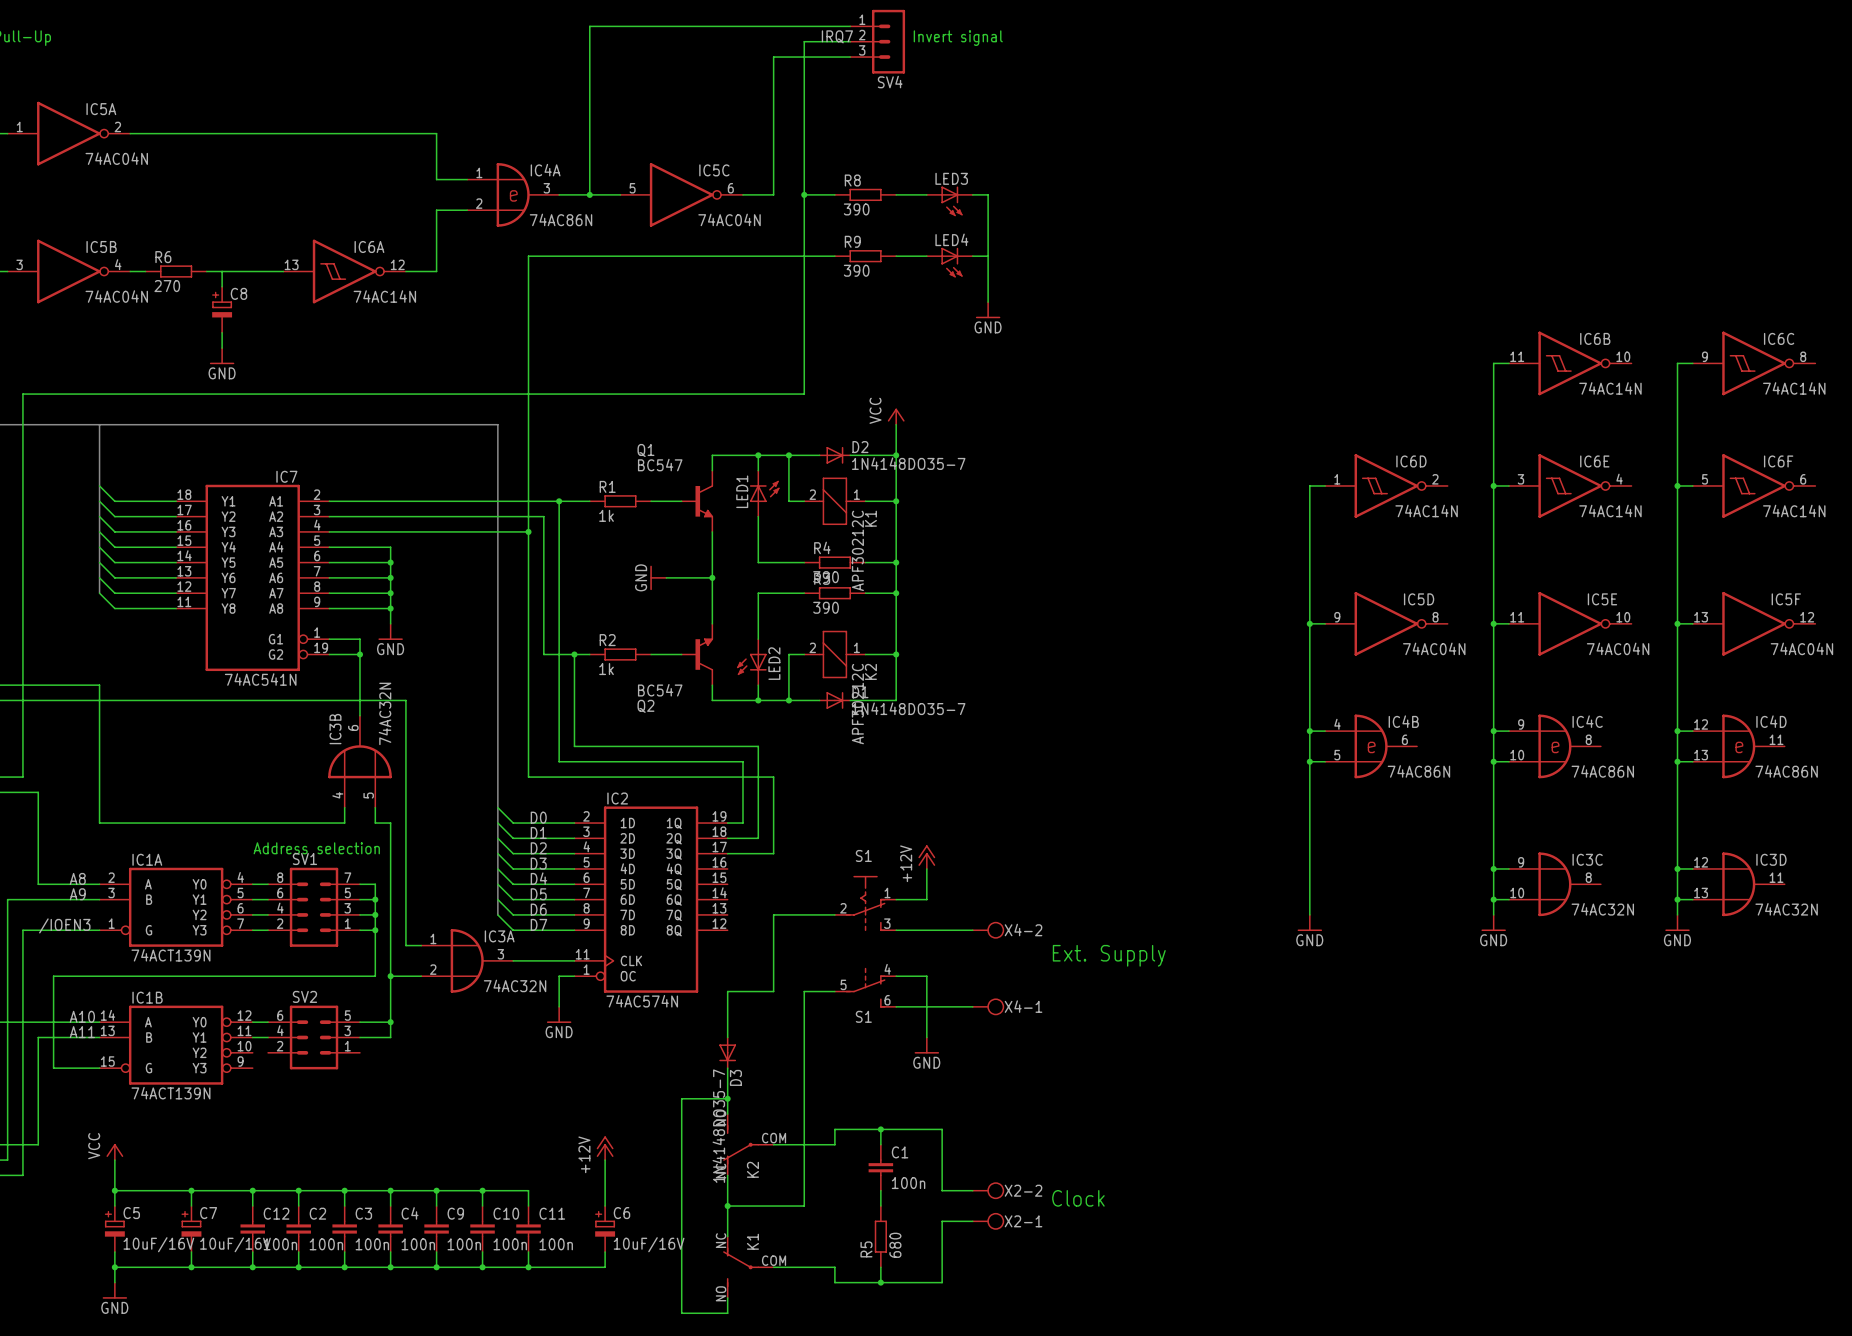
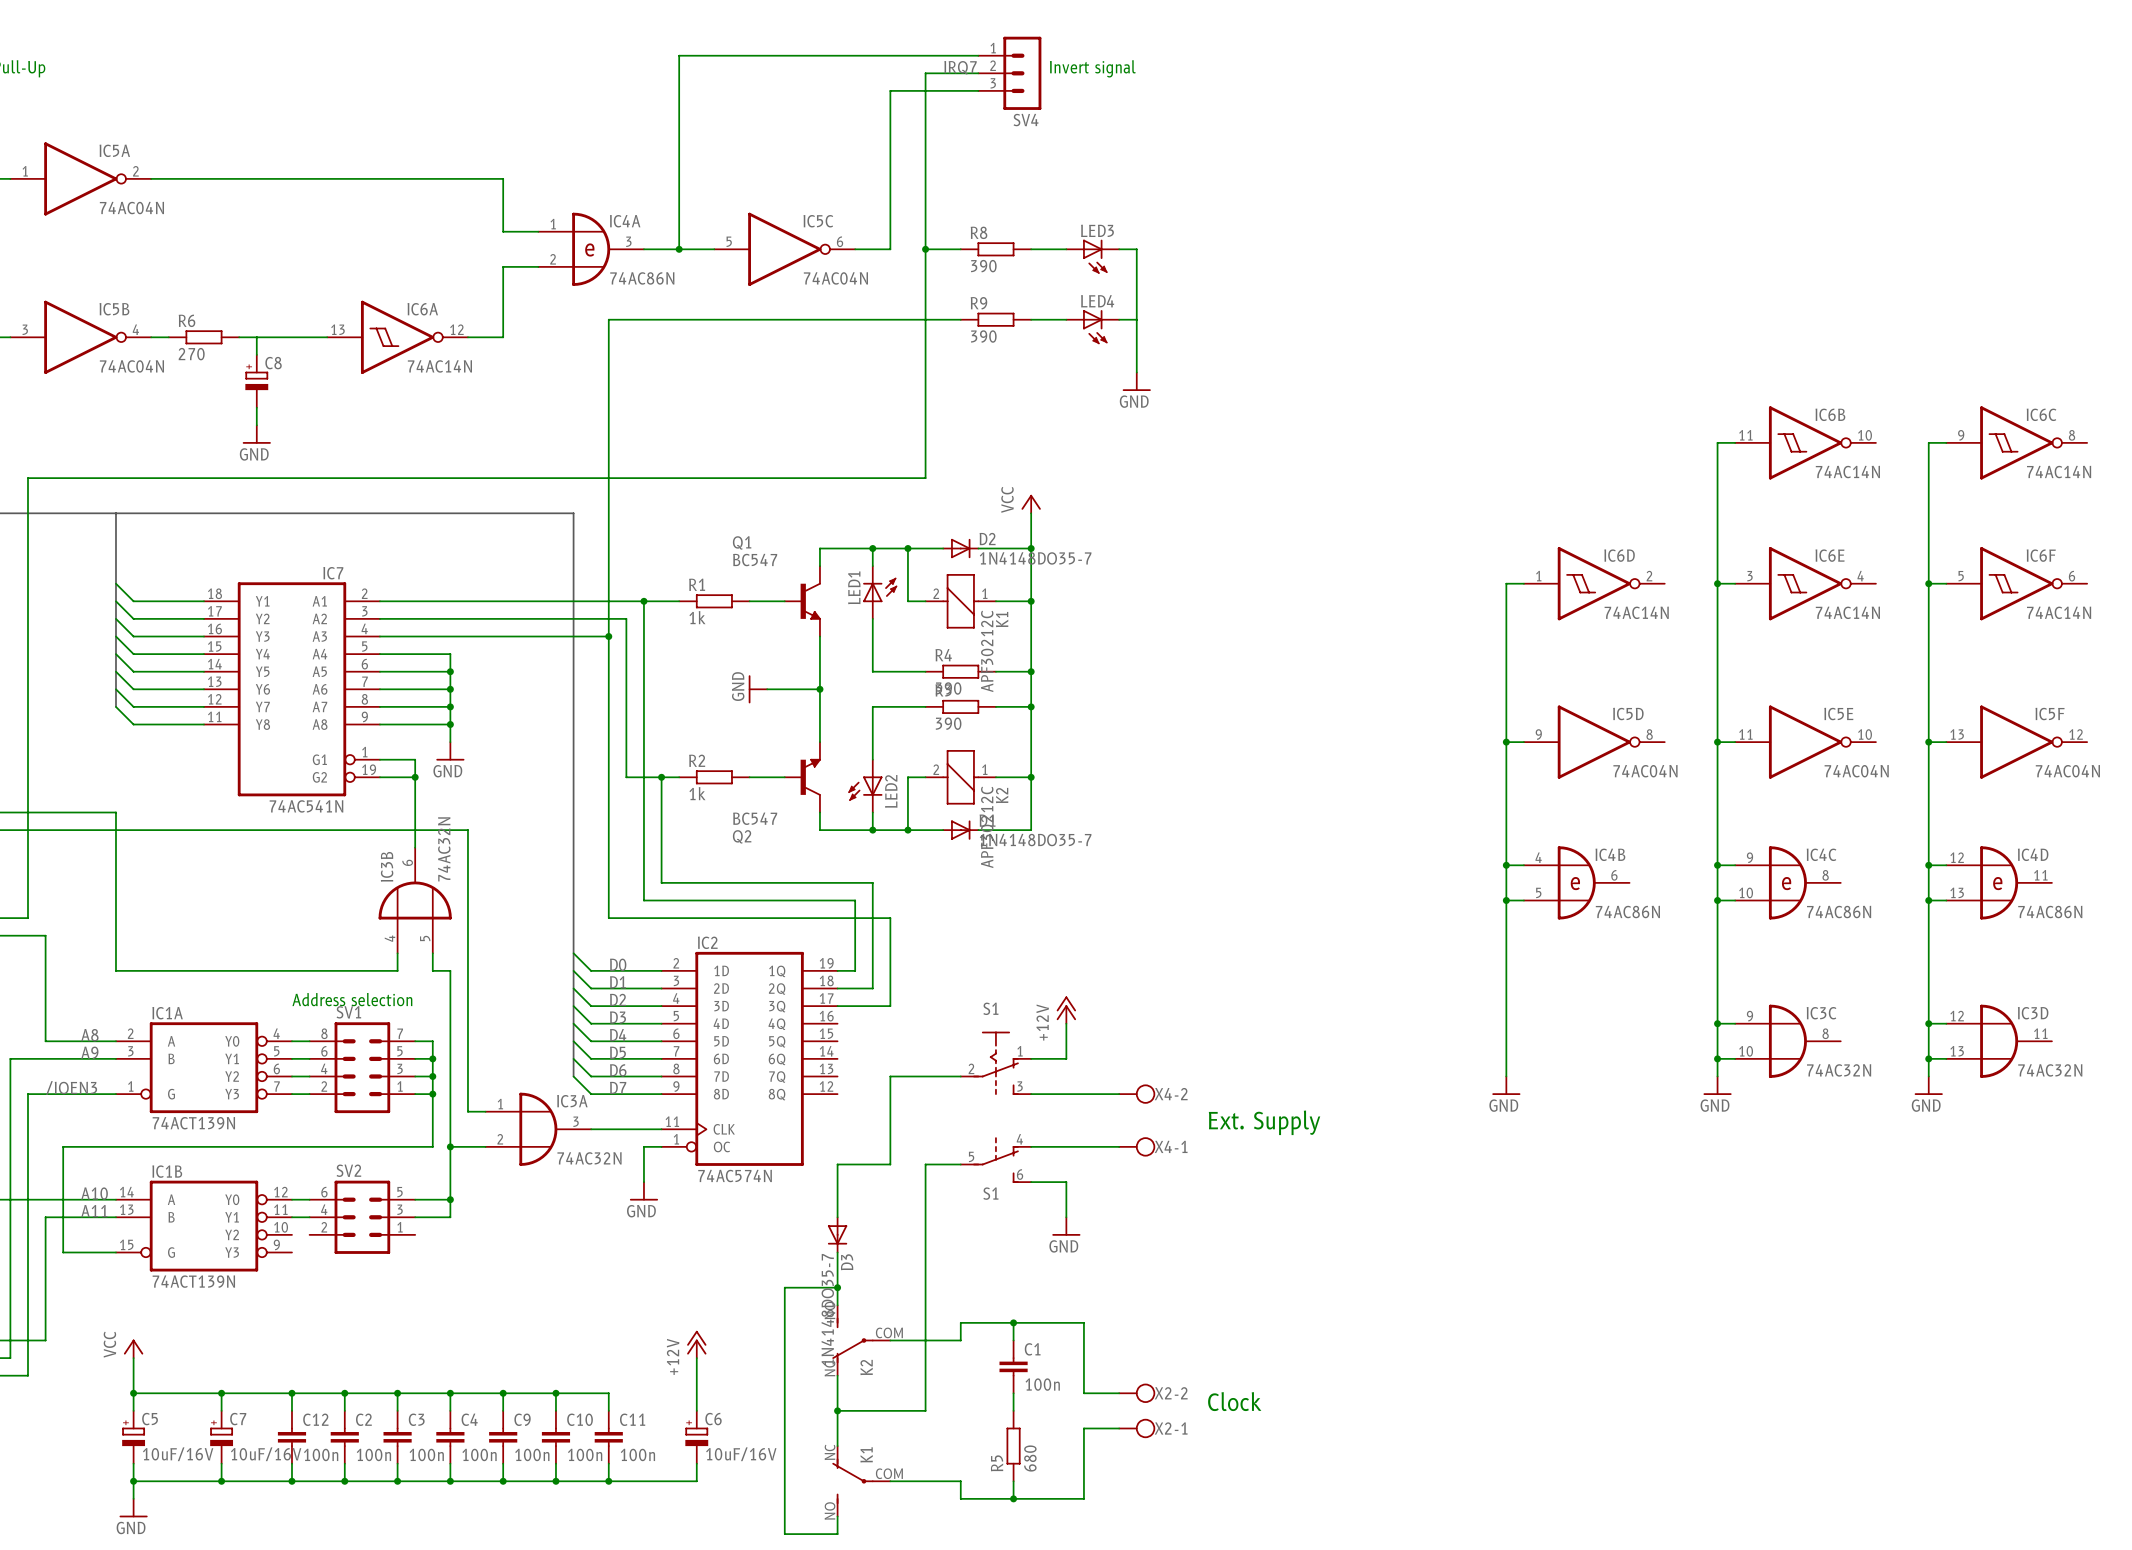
wire: (926, 976) (926, 1006) (972, 1006) -> (1066, 1146) (1119, 1146)
X4-1 position: (988, 1006) -> (1137, 1146)

